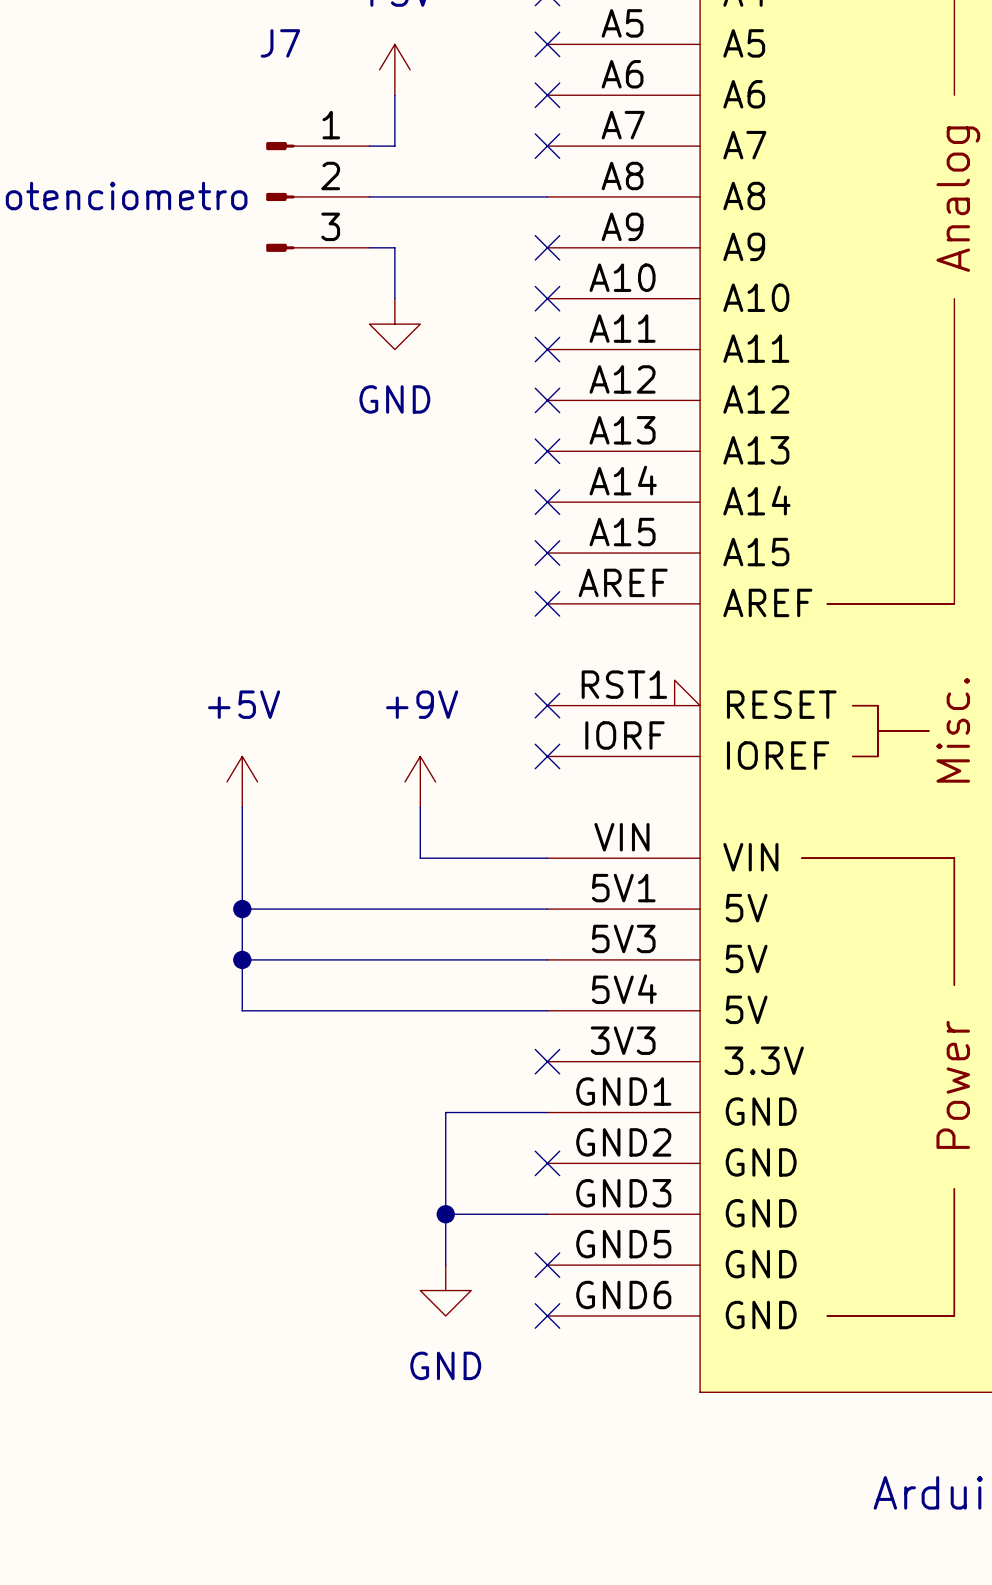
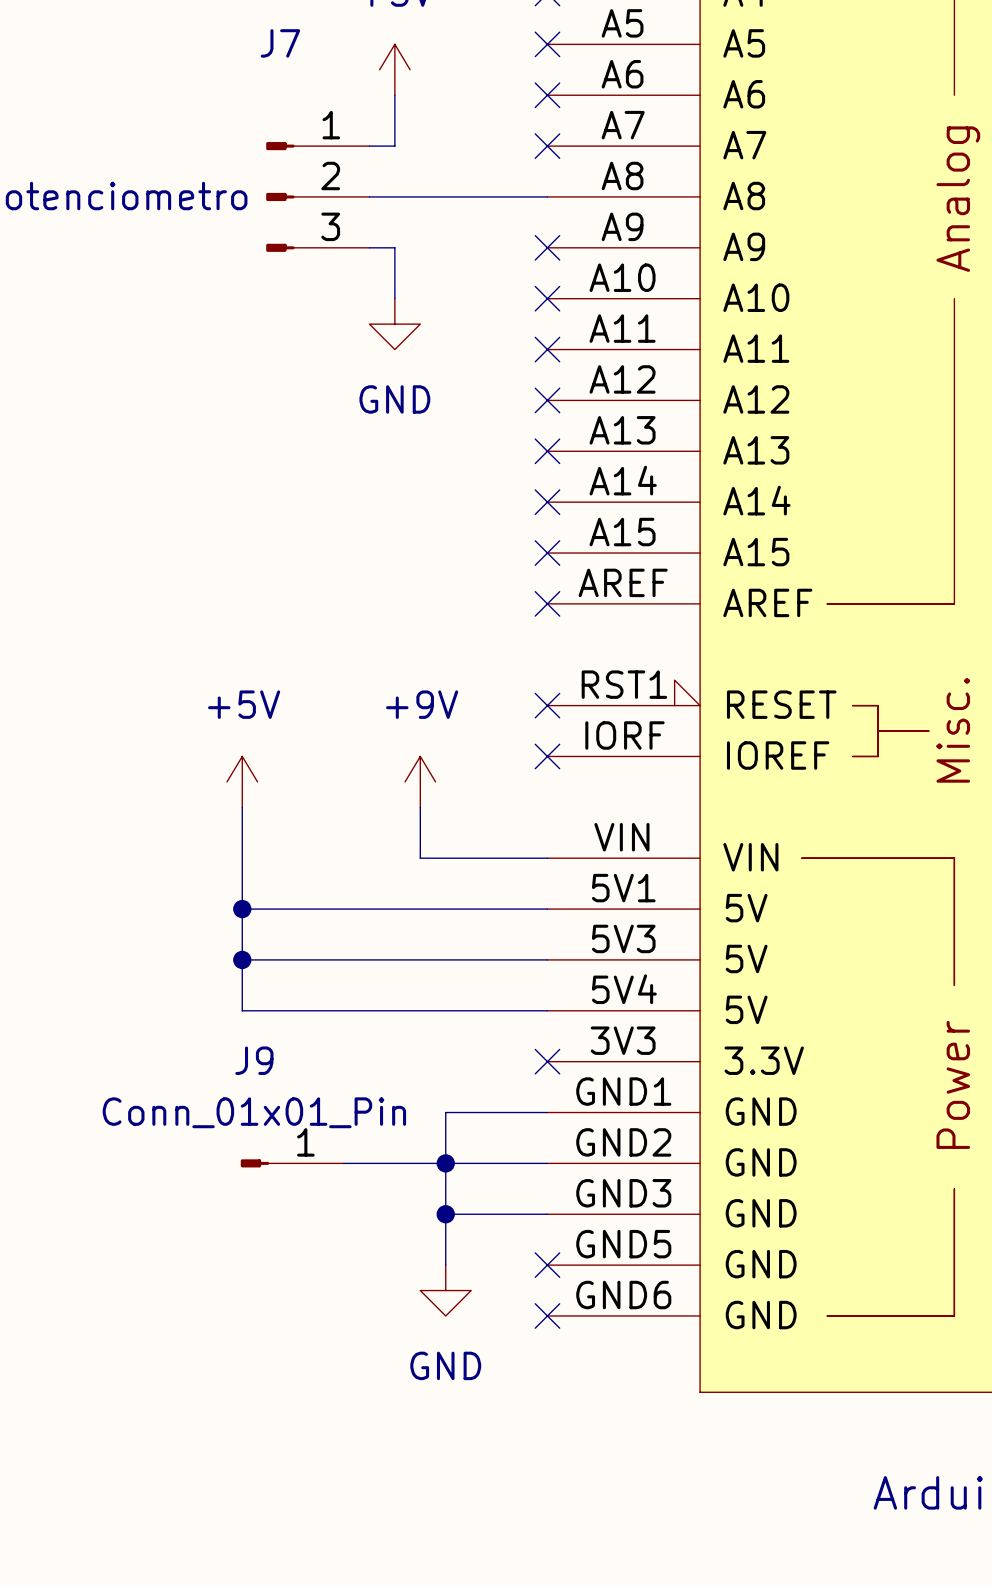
J9: none -> Conn_01x01_Pin (292, 1163)
wire: none -> (344, 1163) (547, 1163)
junction: none -> (445, 1163)
no-connect mark: (547, 1163) -> none

